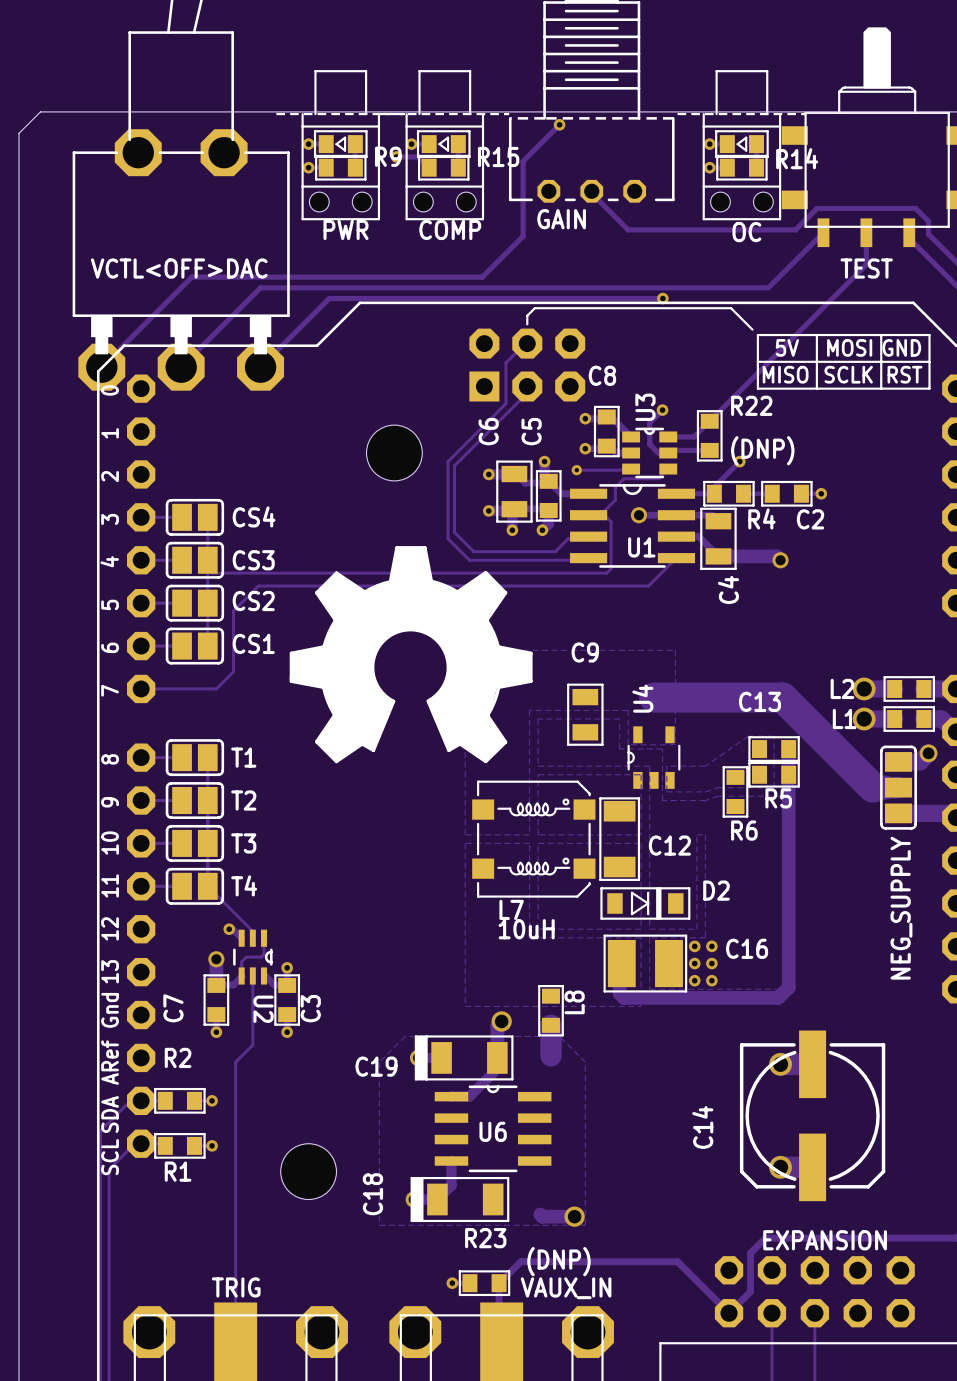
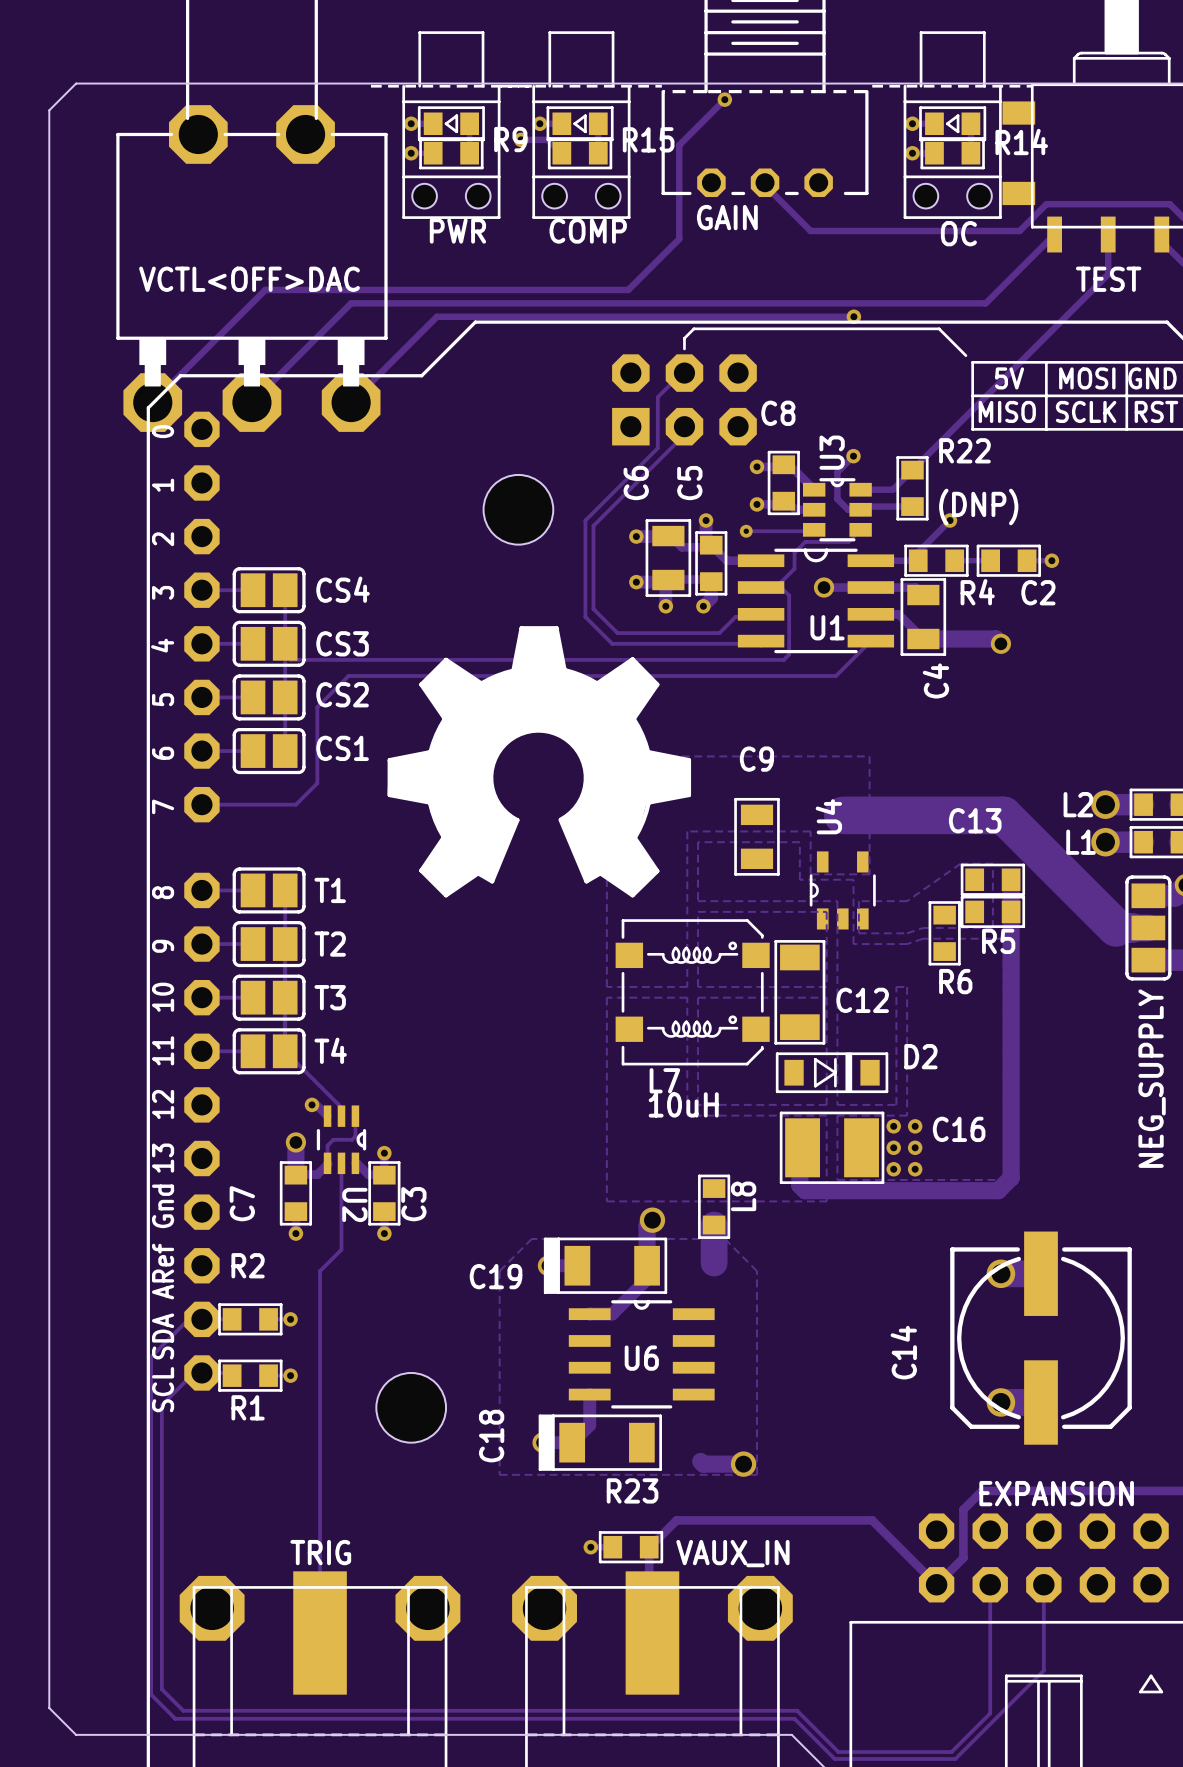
text: (DNP) (558, 1261) -> none

